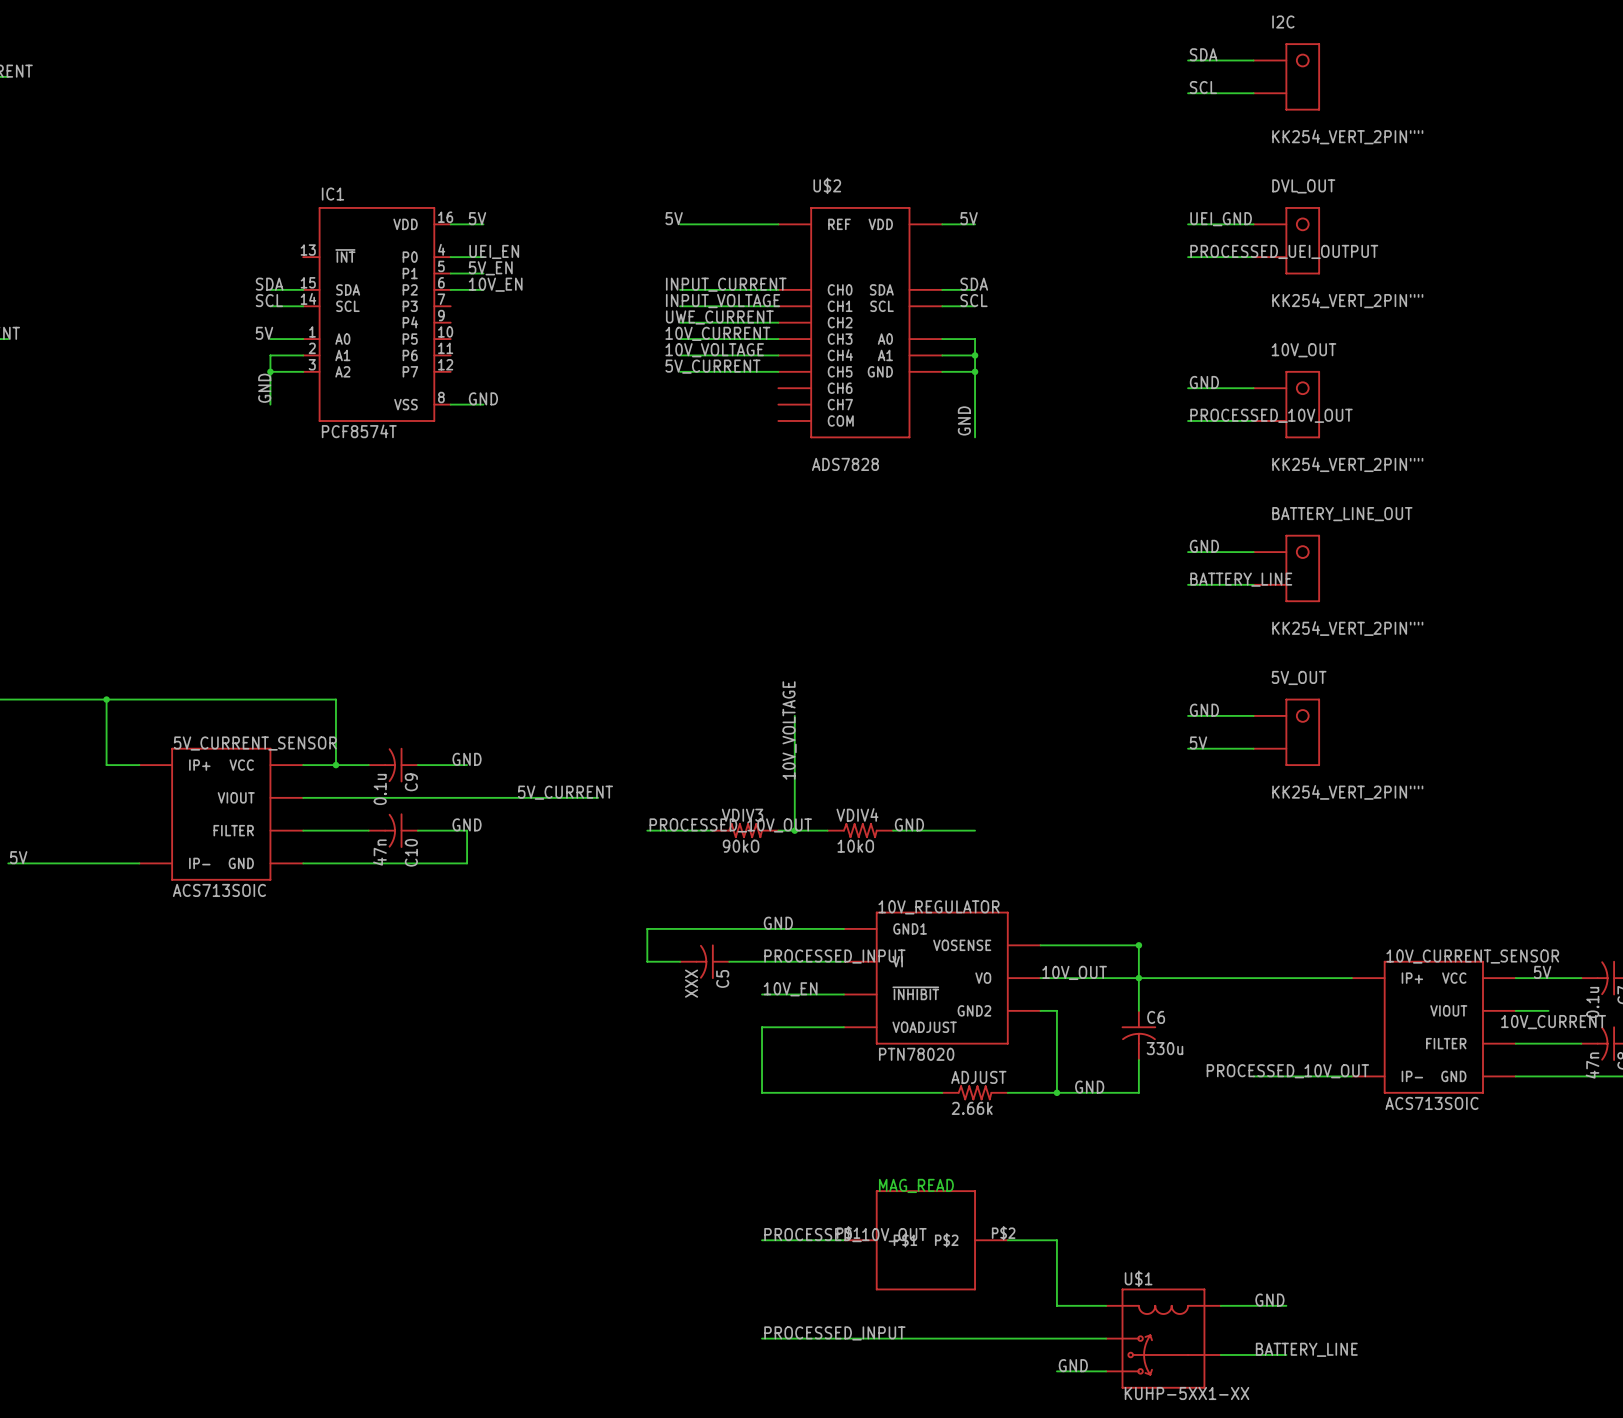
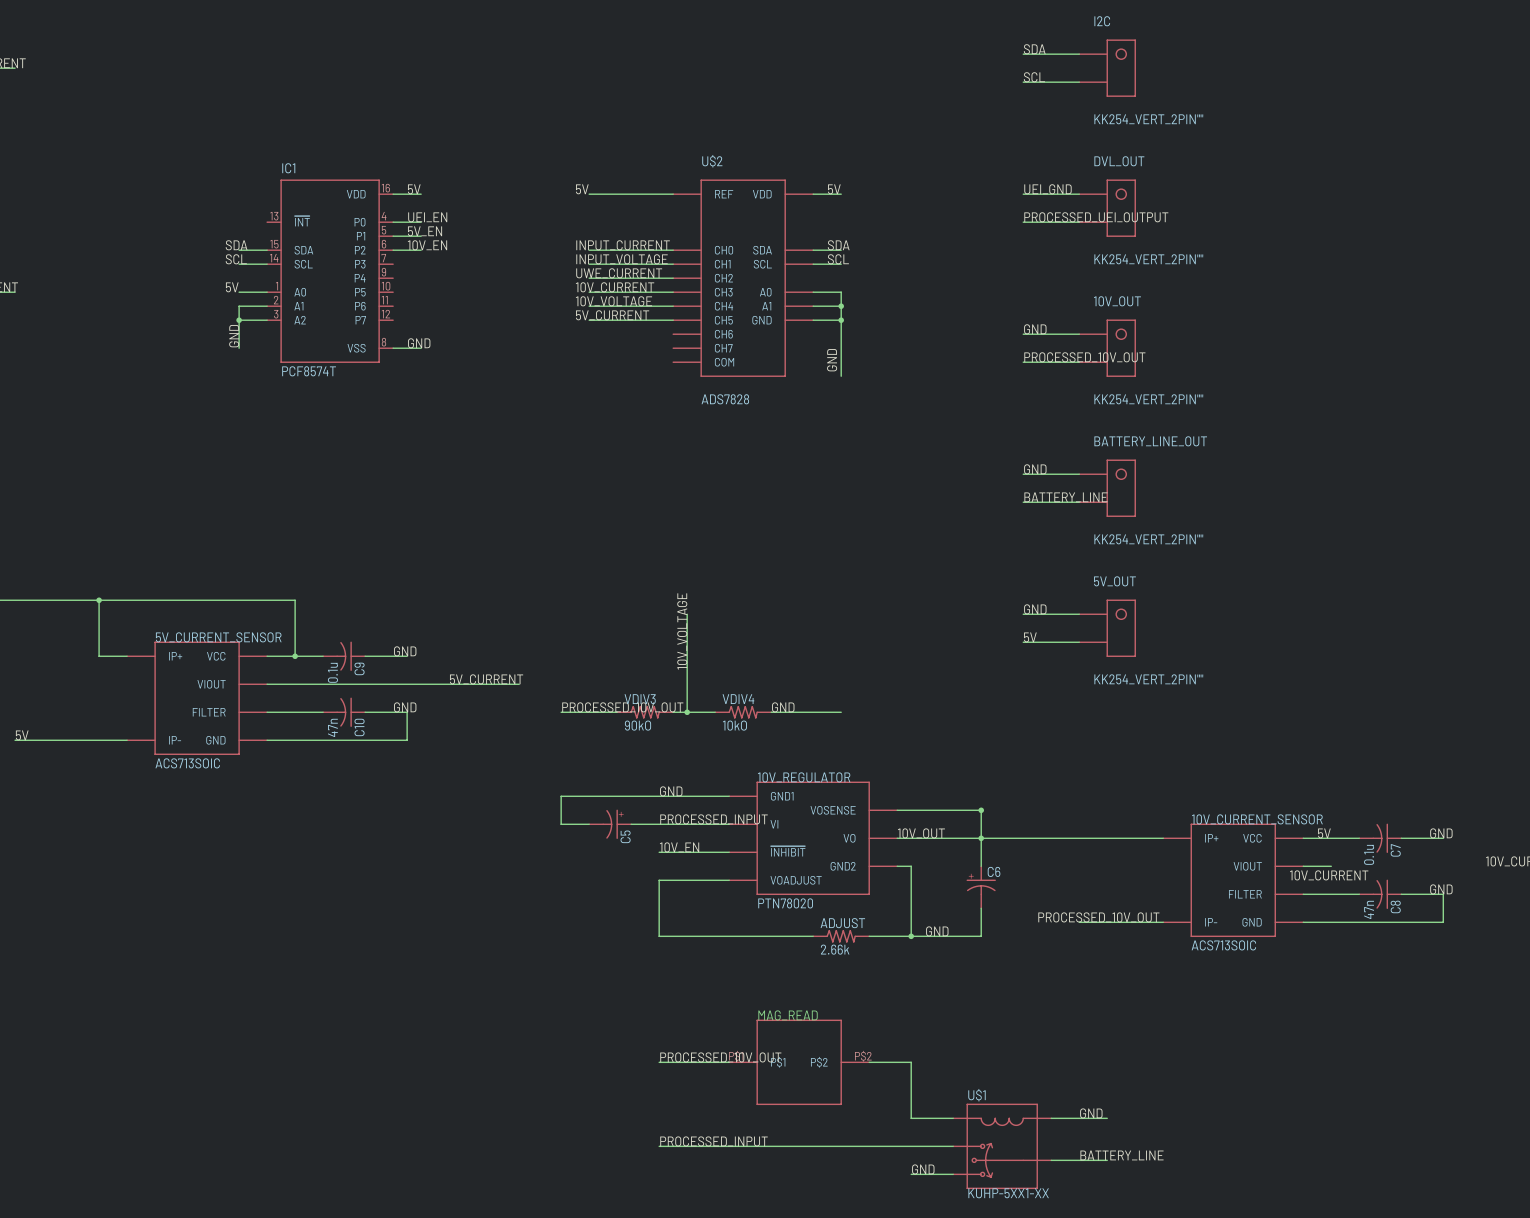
C5 symbol: [680, 944, 730, 979] -> [589, 809, 632, 840]
C5 value: XXX (691, 983) -> none
C6 symbol: [1121, 1010, 1157, 1061] -> [966, 866, 996, 909]
C6 value: 330u (1164, 1048) -> none

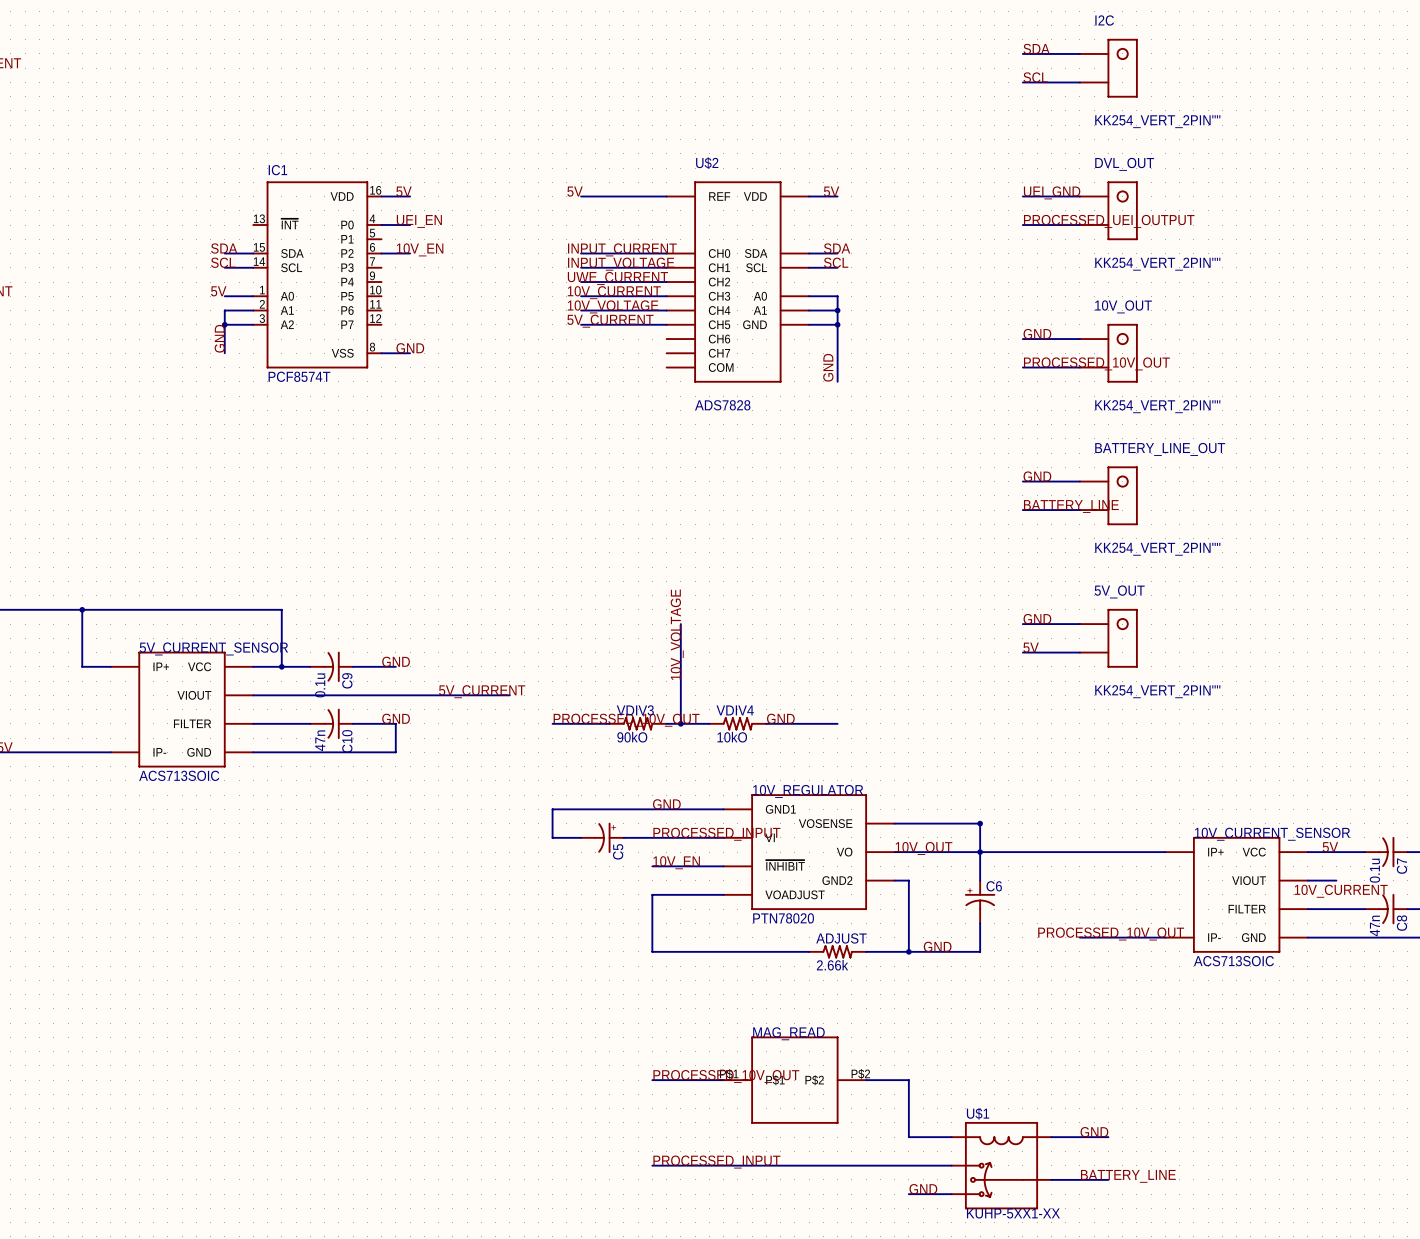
label: 5V_EN (425, 231) -> none
wire: (393, 236) (421, 236) -> none

